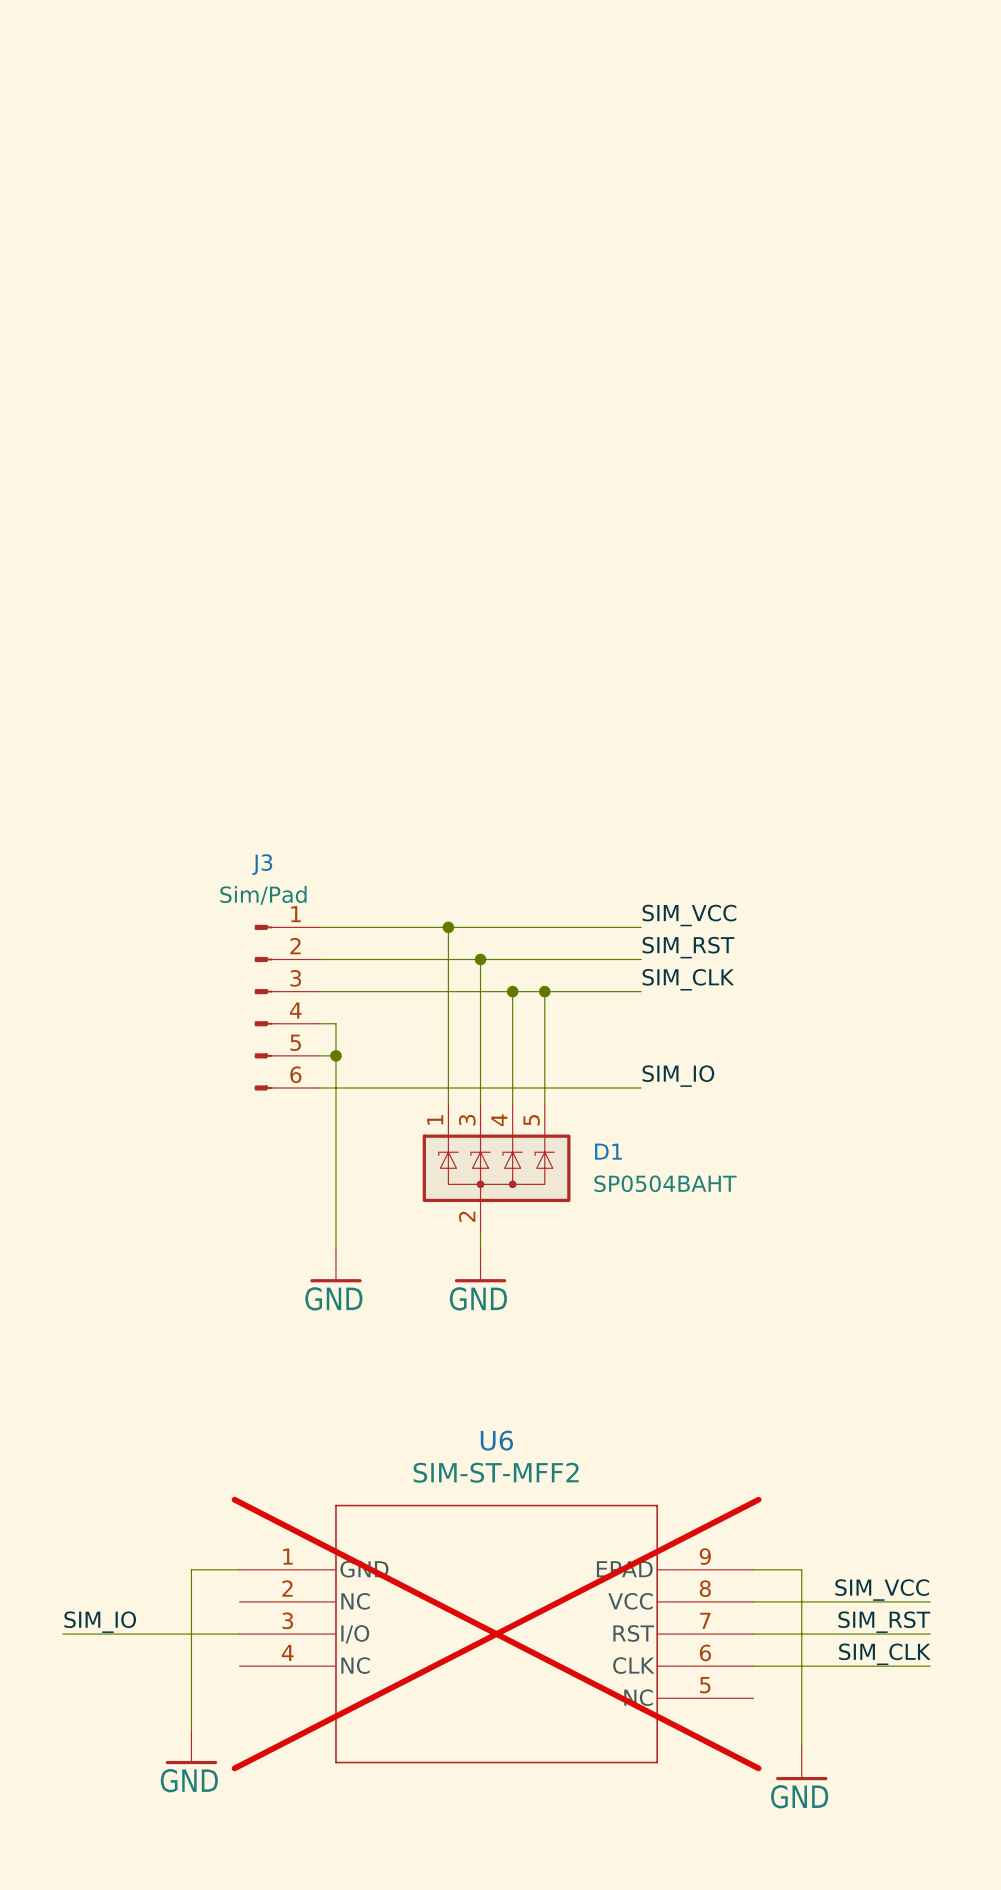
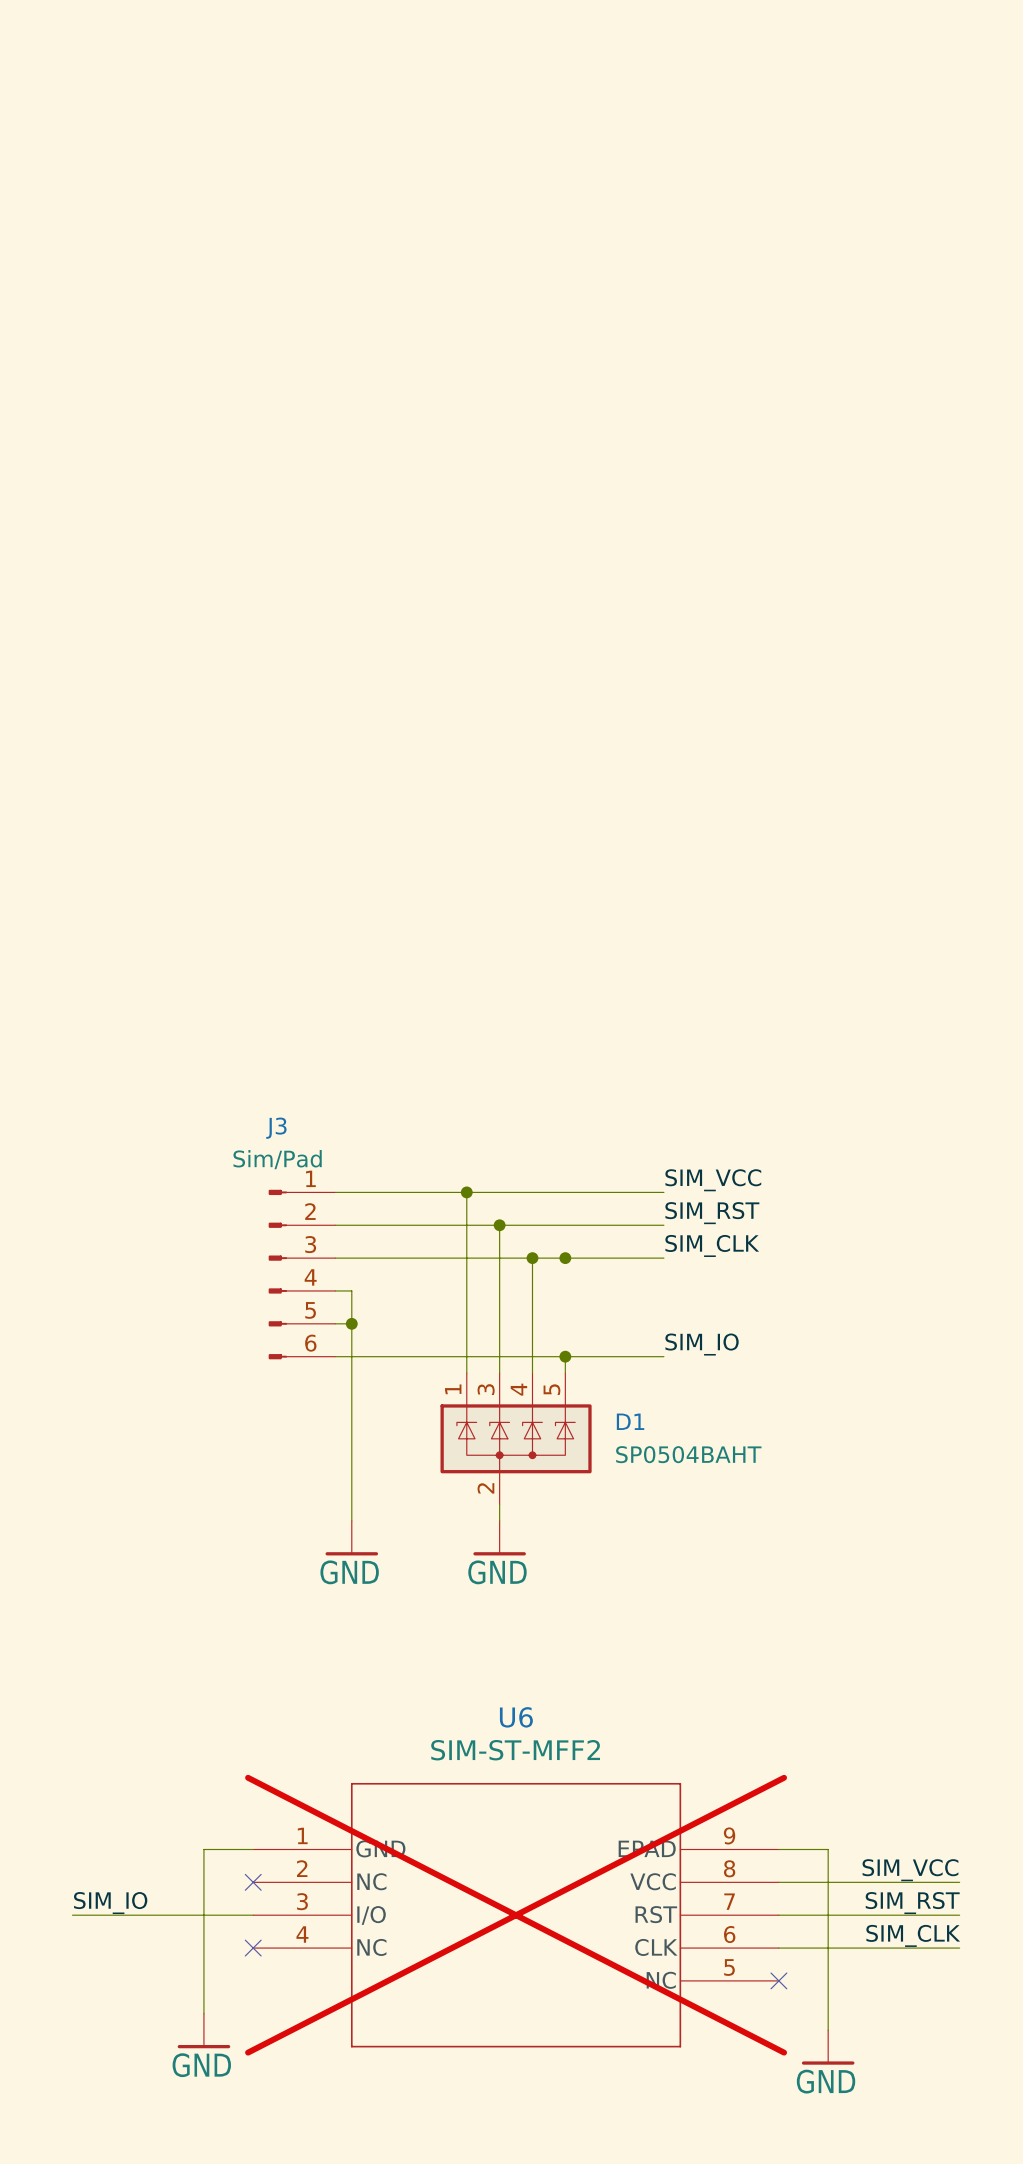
wire: (544, 991) (544, 1087) -> none
junction: none -> (565, 1356)
no-connect mark: none -> (253, 1882)
no-connect mark: none -> (253, 1948)
no-connect mark: none -> (778, 1980)

